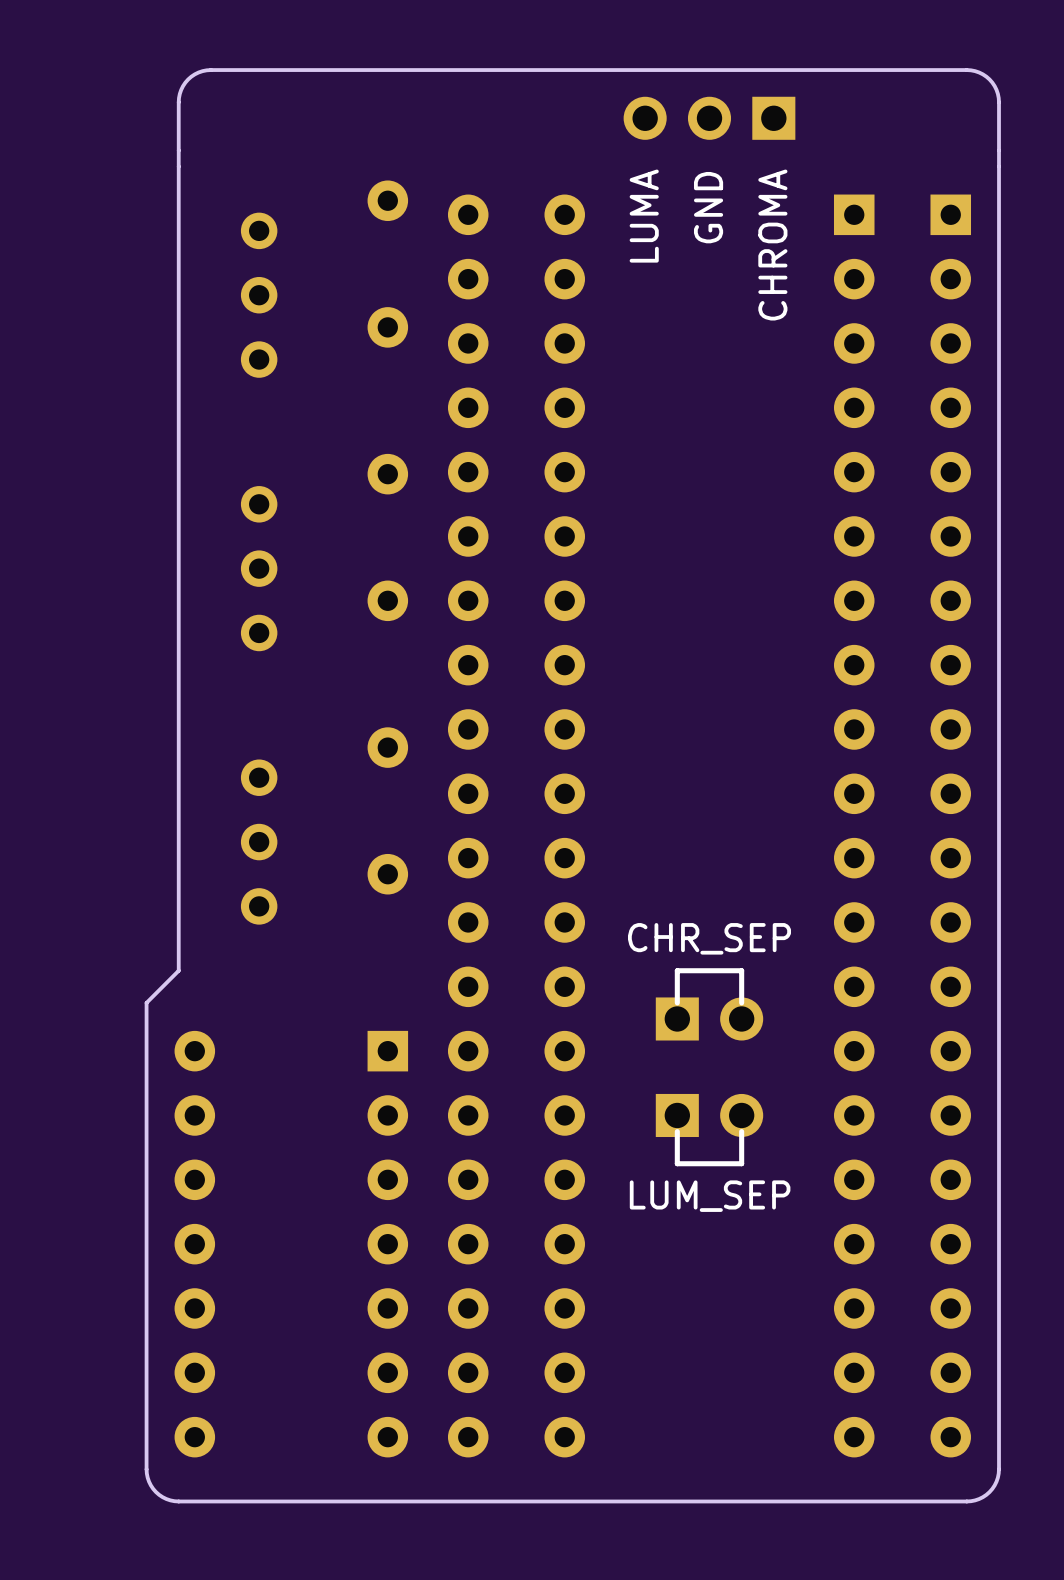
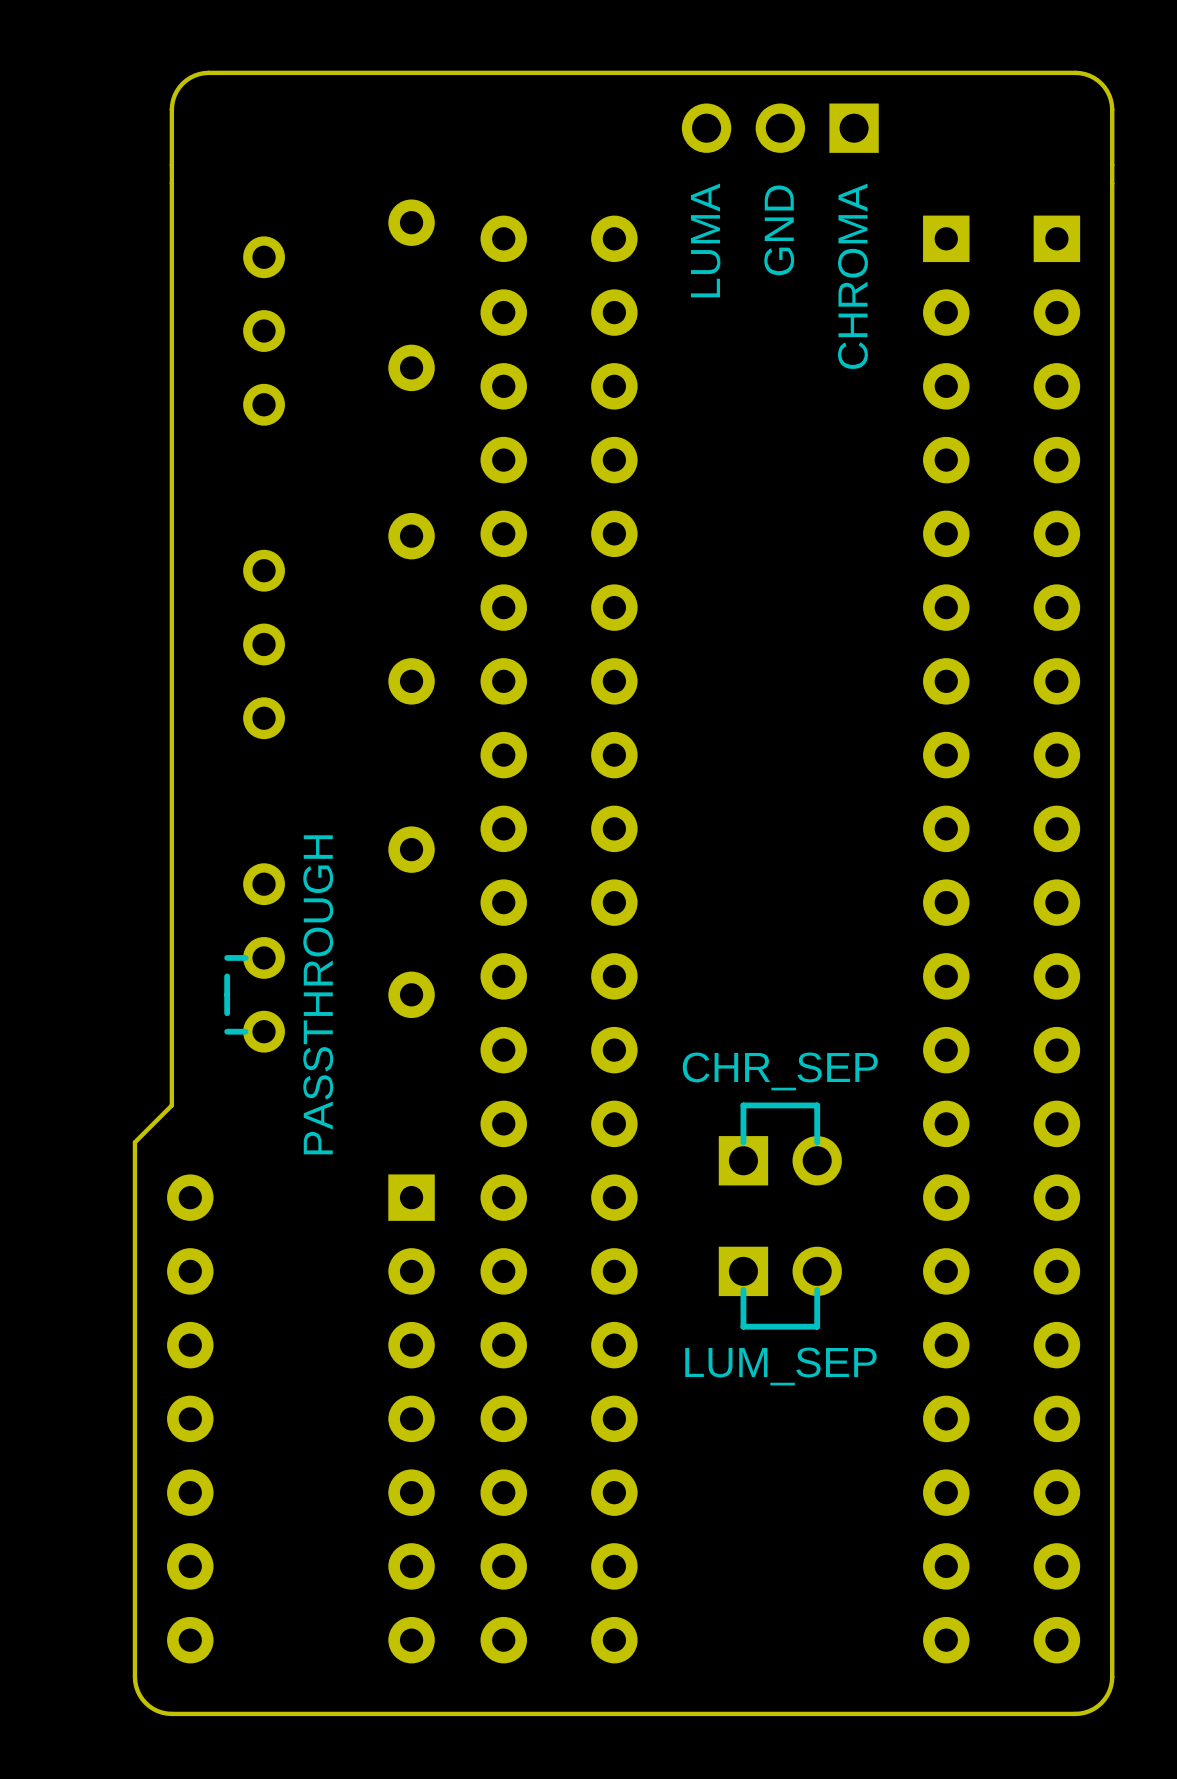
line: none -> (245, 957) (227, 957)
line: none -> (227, 976) (227, 1013)
text: none -> PASSTHROUGH (318, 994)
line: none -> (245, 1031) (227, 1031)

